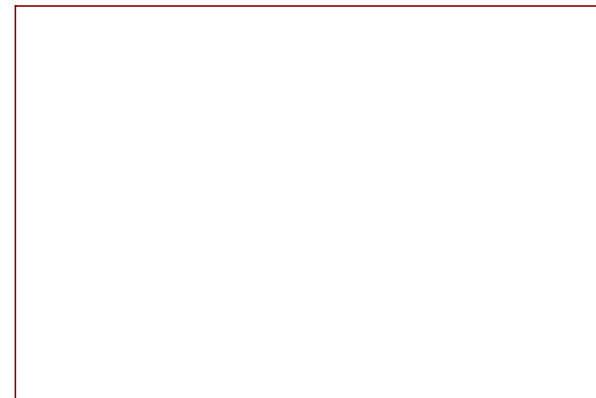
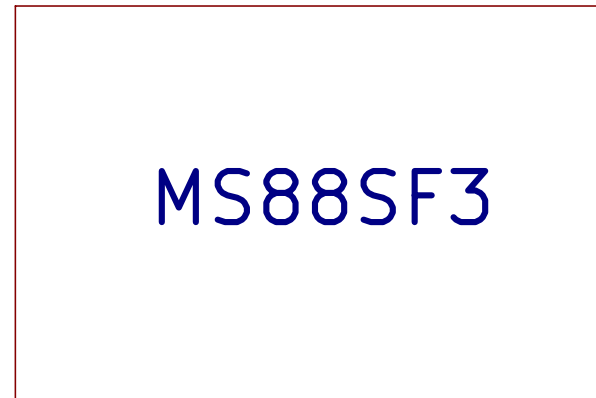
text: none -> MS88SF3 (323, 196)

